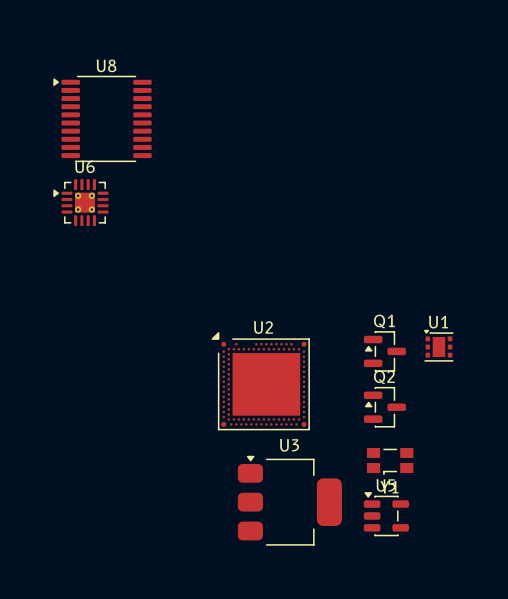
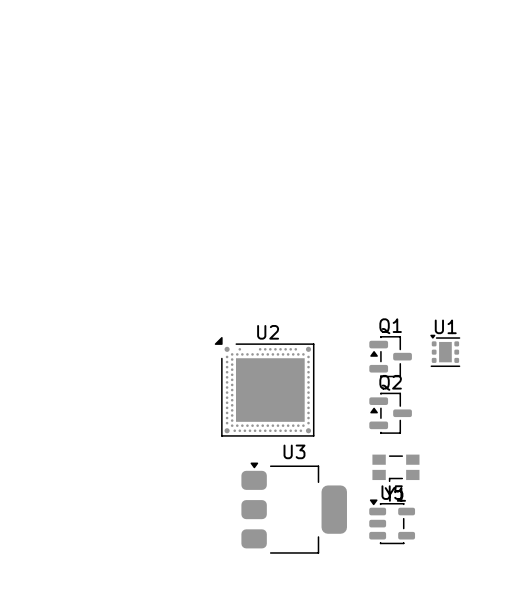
U8: (102, 118) -> none
U6: (80, 202) -> none

